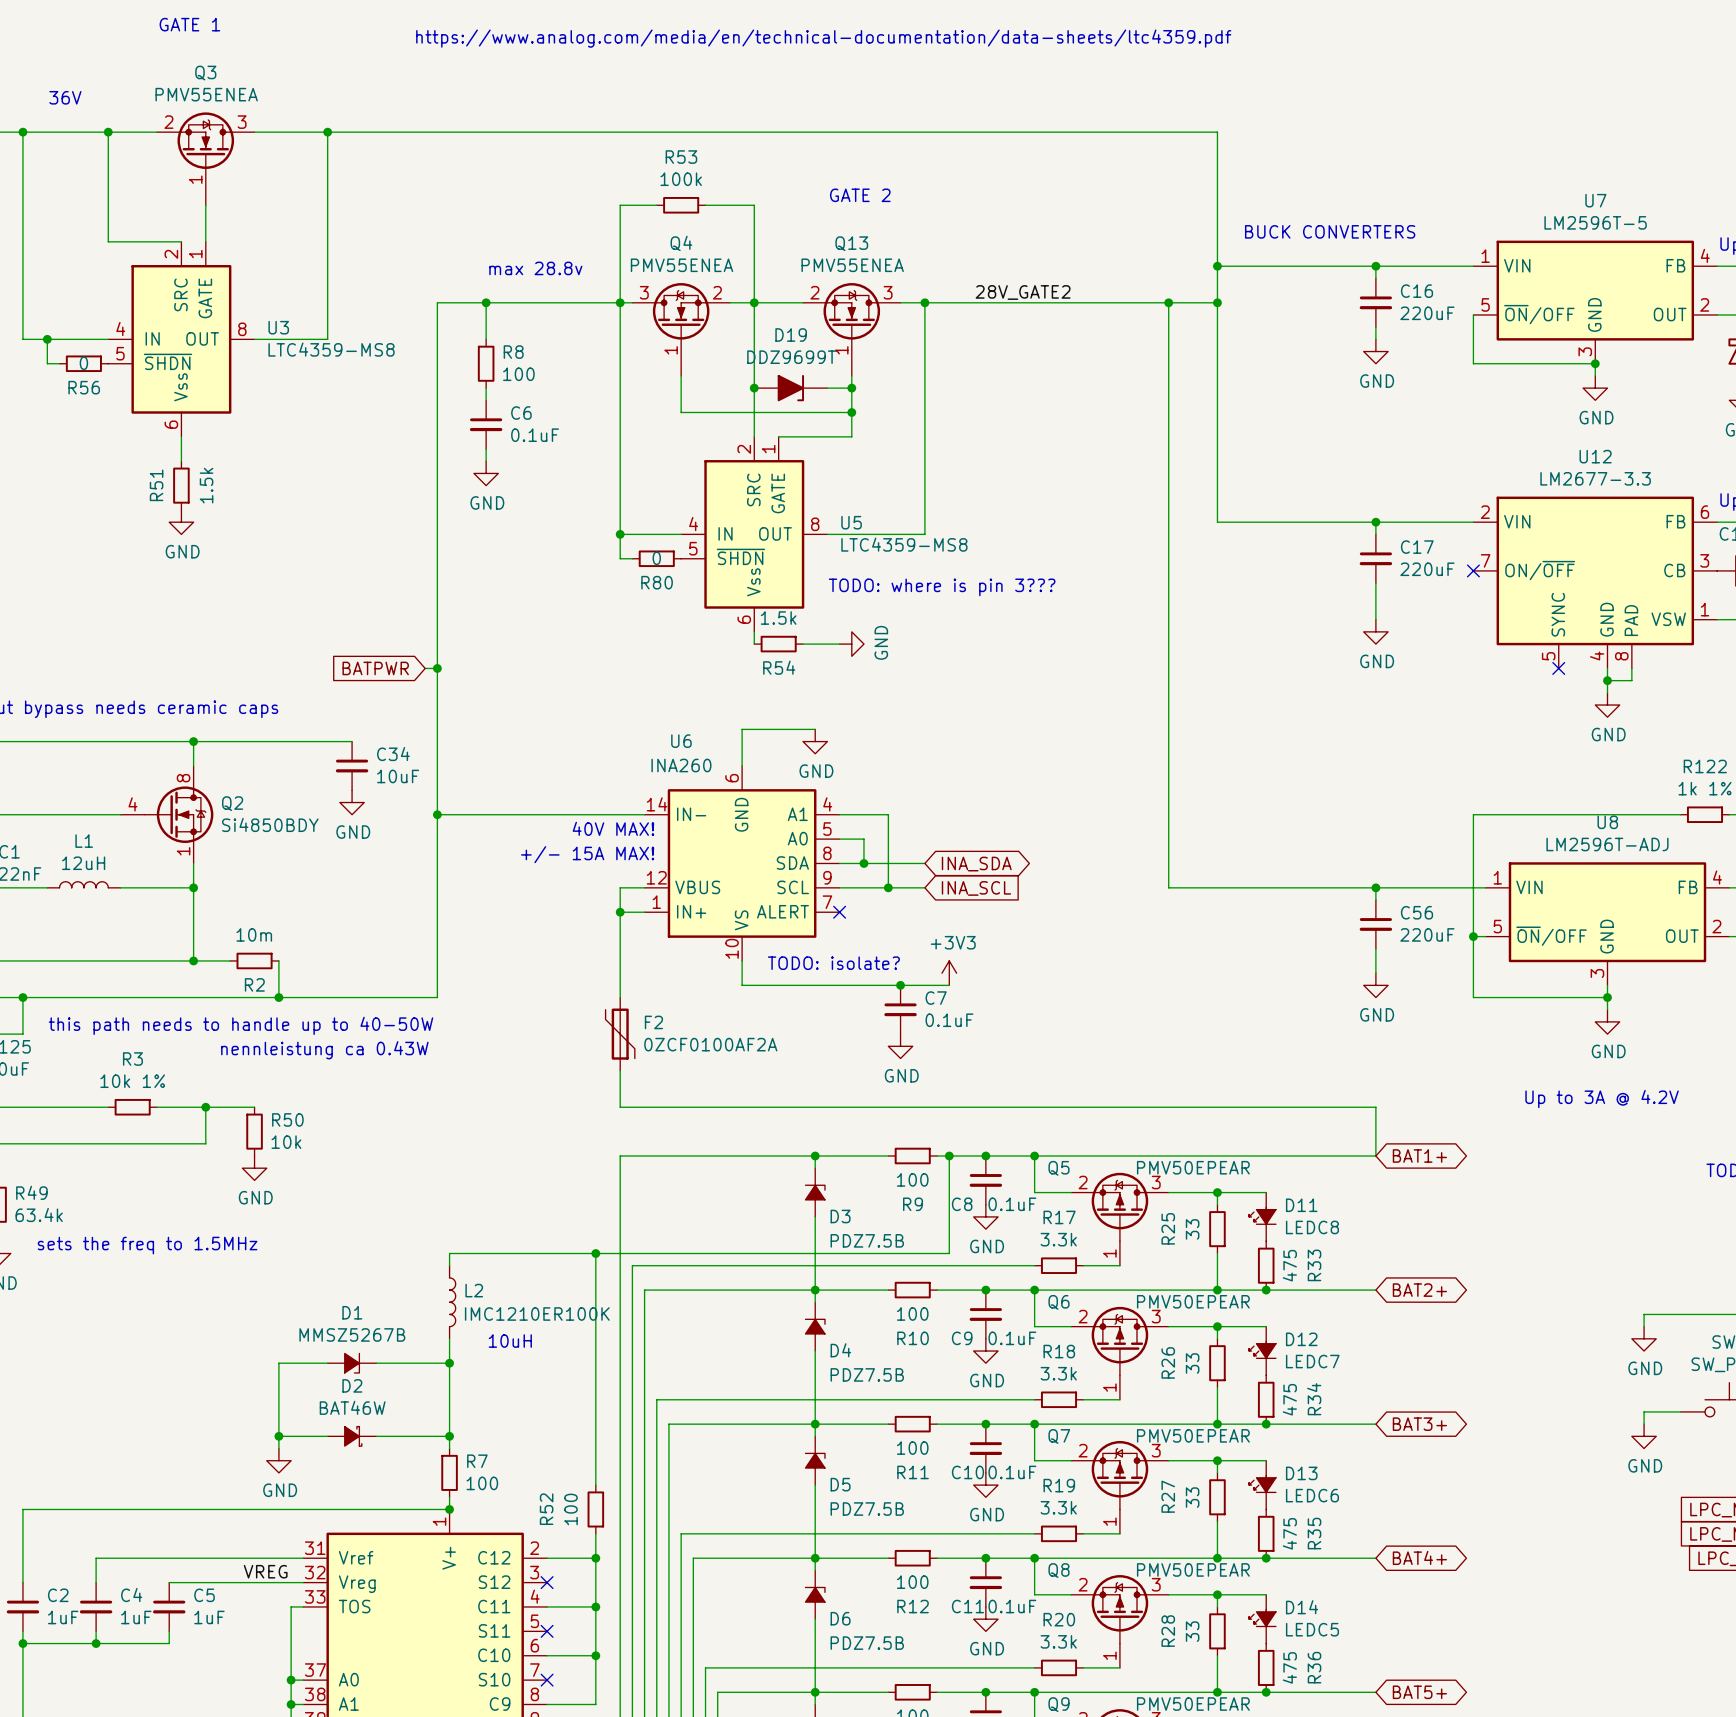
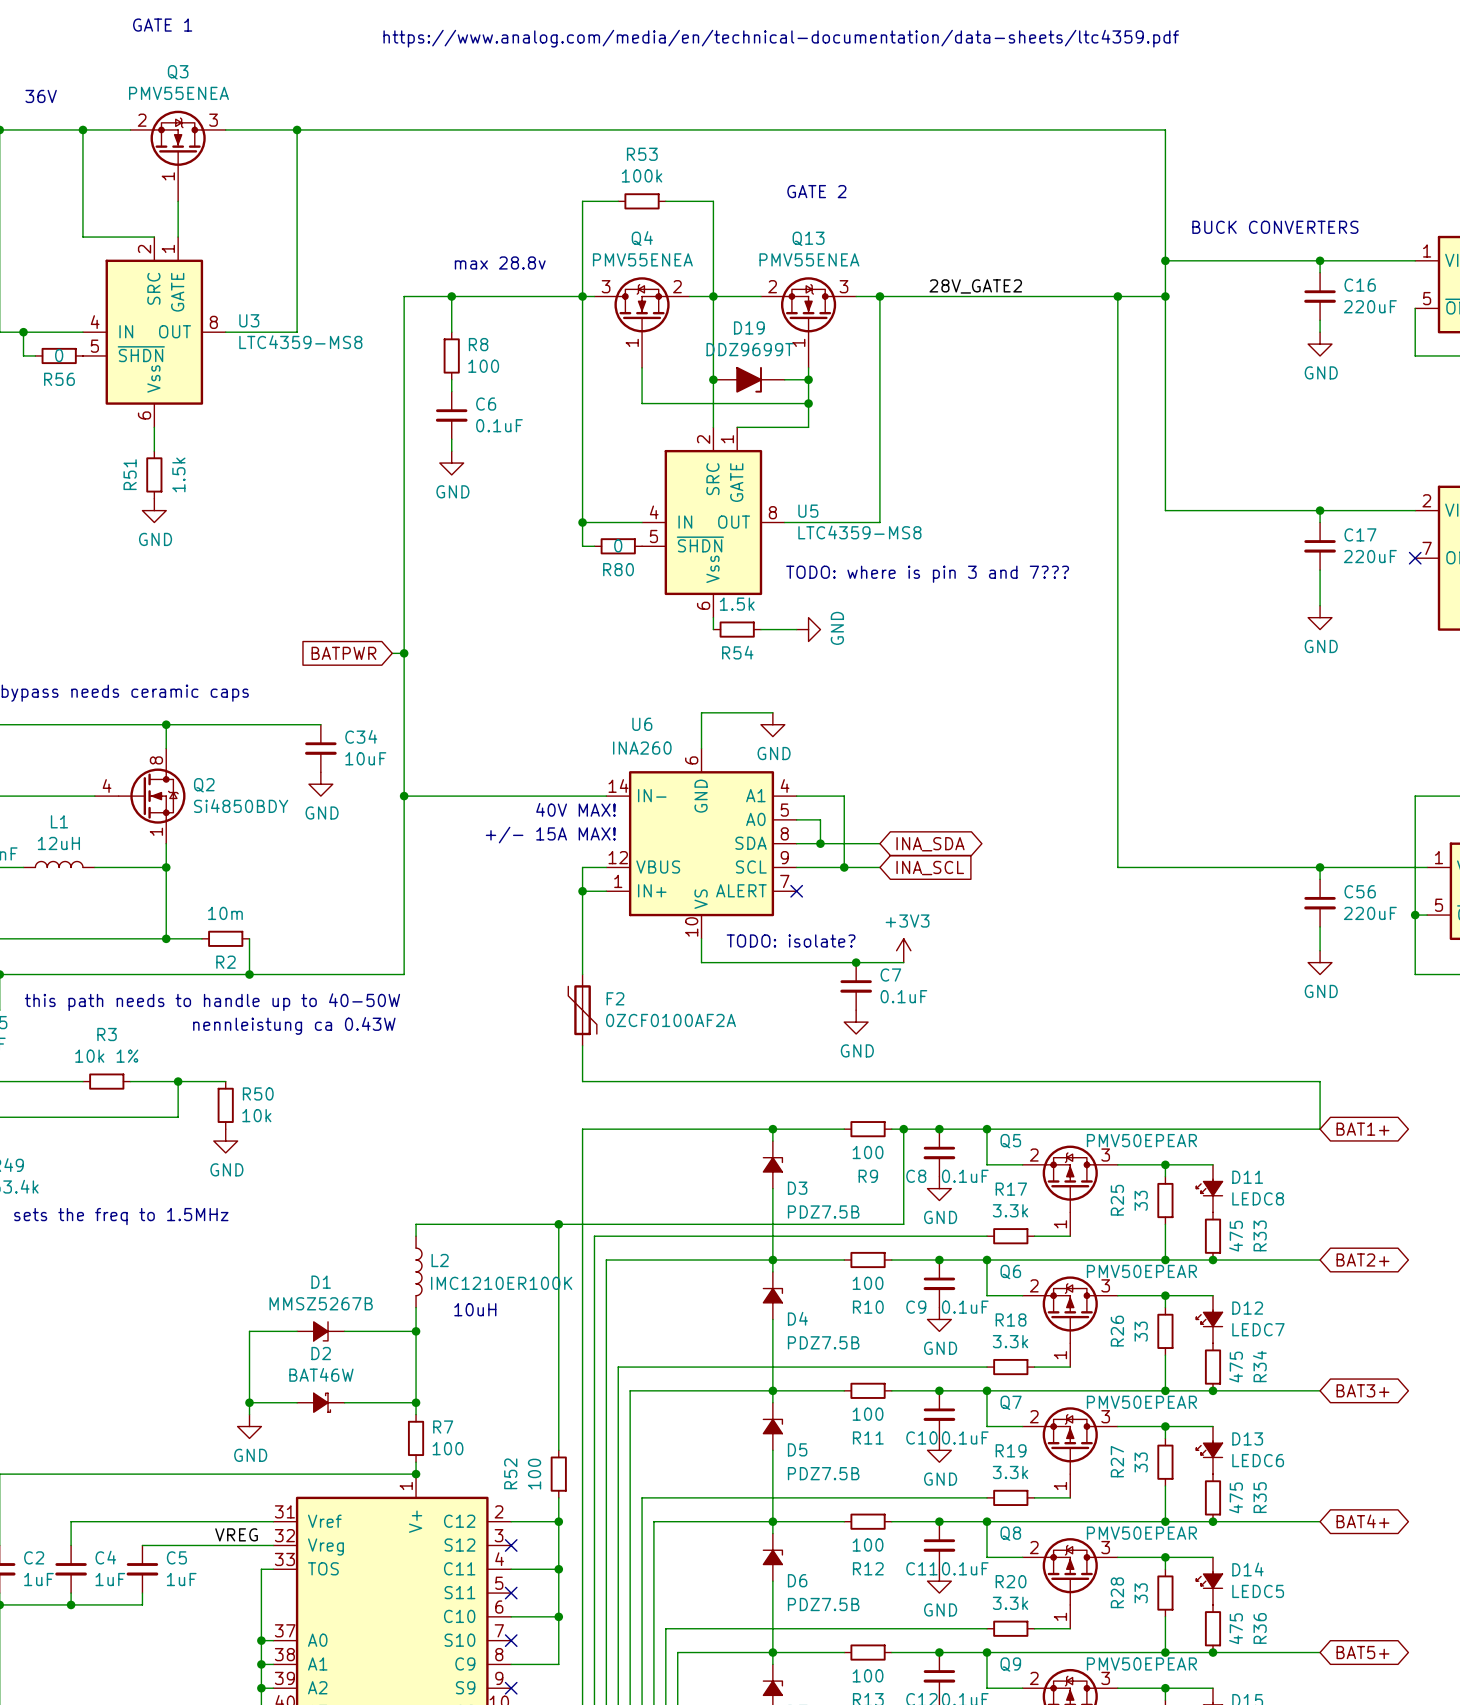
text: TODO: where is pin 3??? (942, 587) -> TODO: where is pin 3 and 7??? (927, 574)

